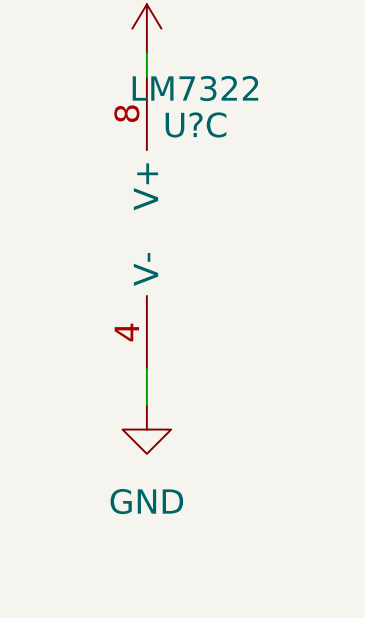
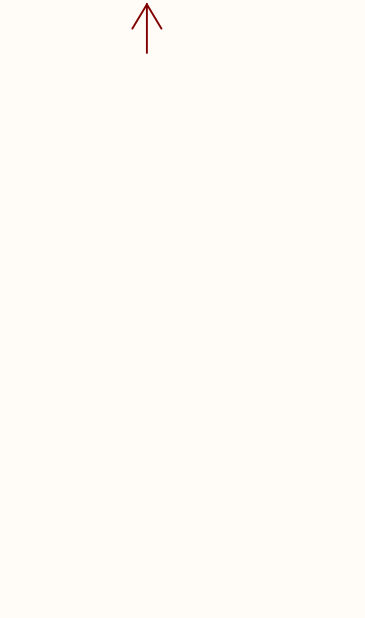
wire: (146, 52) (146, 77) -> none
U?C: LM7322 (146, 223) -> none
wire: (146, 368) (146, 405) -> none
power symbol: GND (146, 429) -> none

